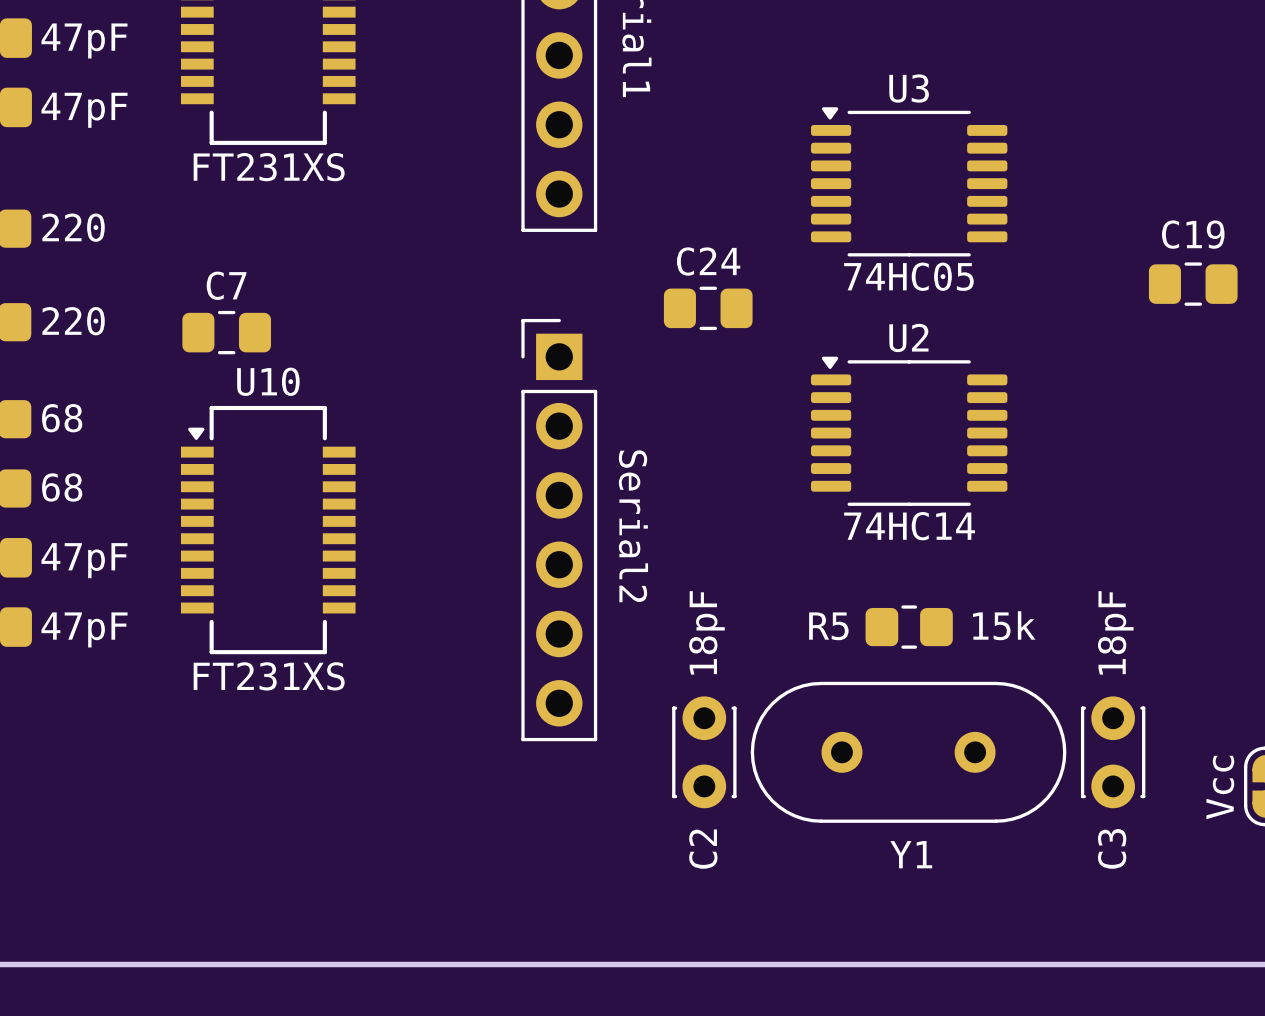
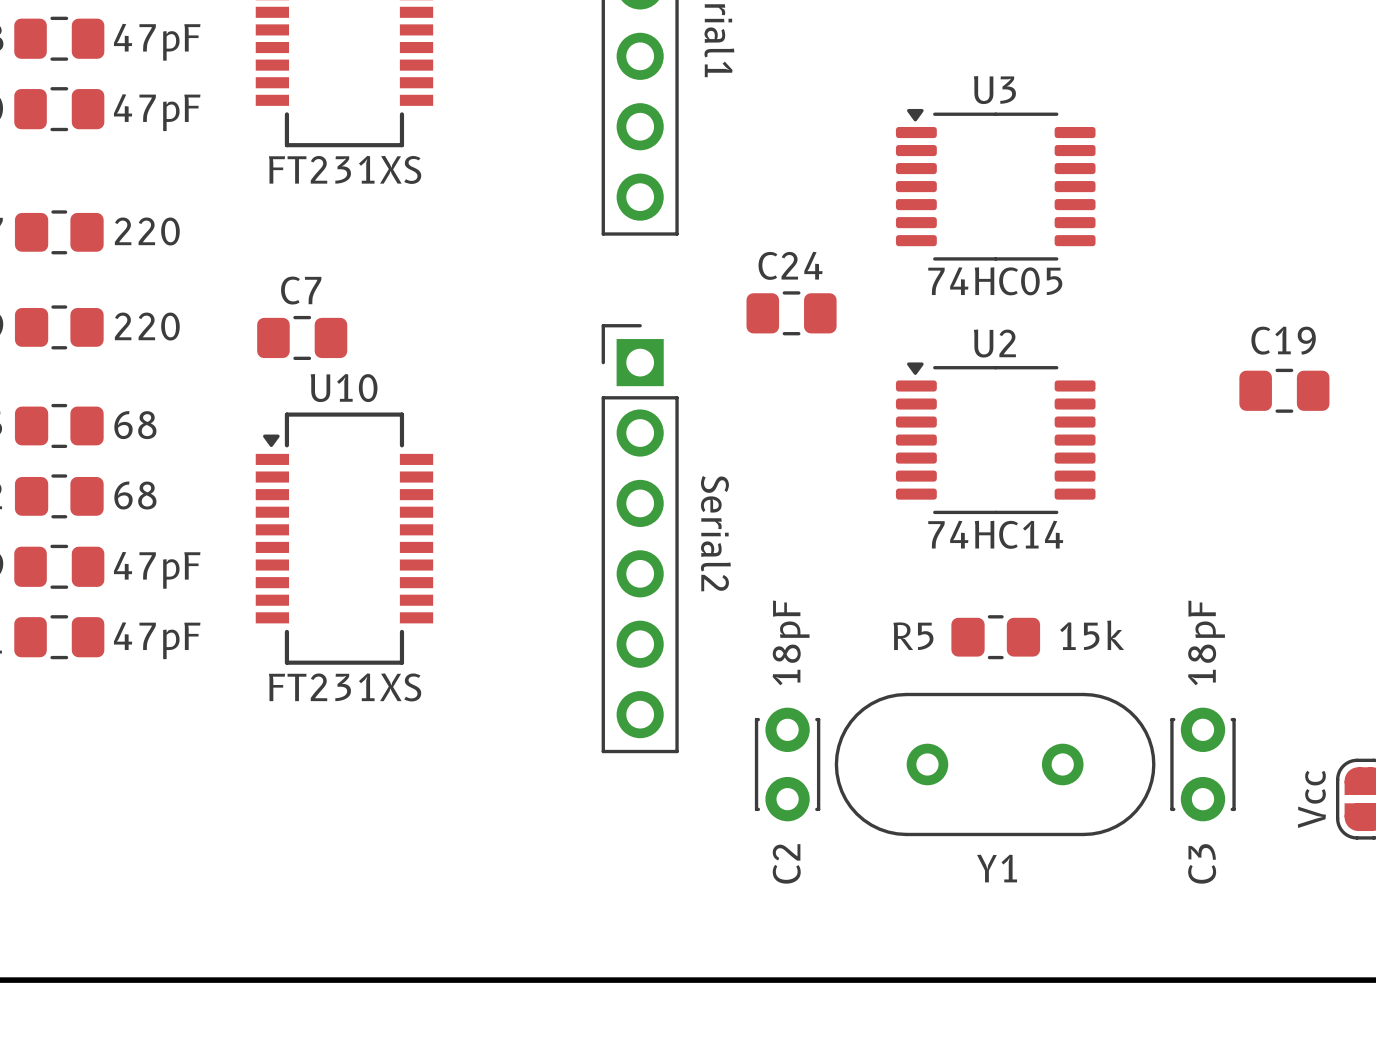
C19 position: (1193, 284) -> (1284, 390)

